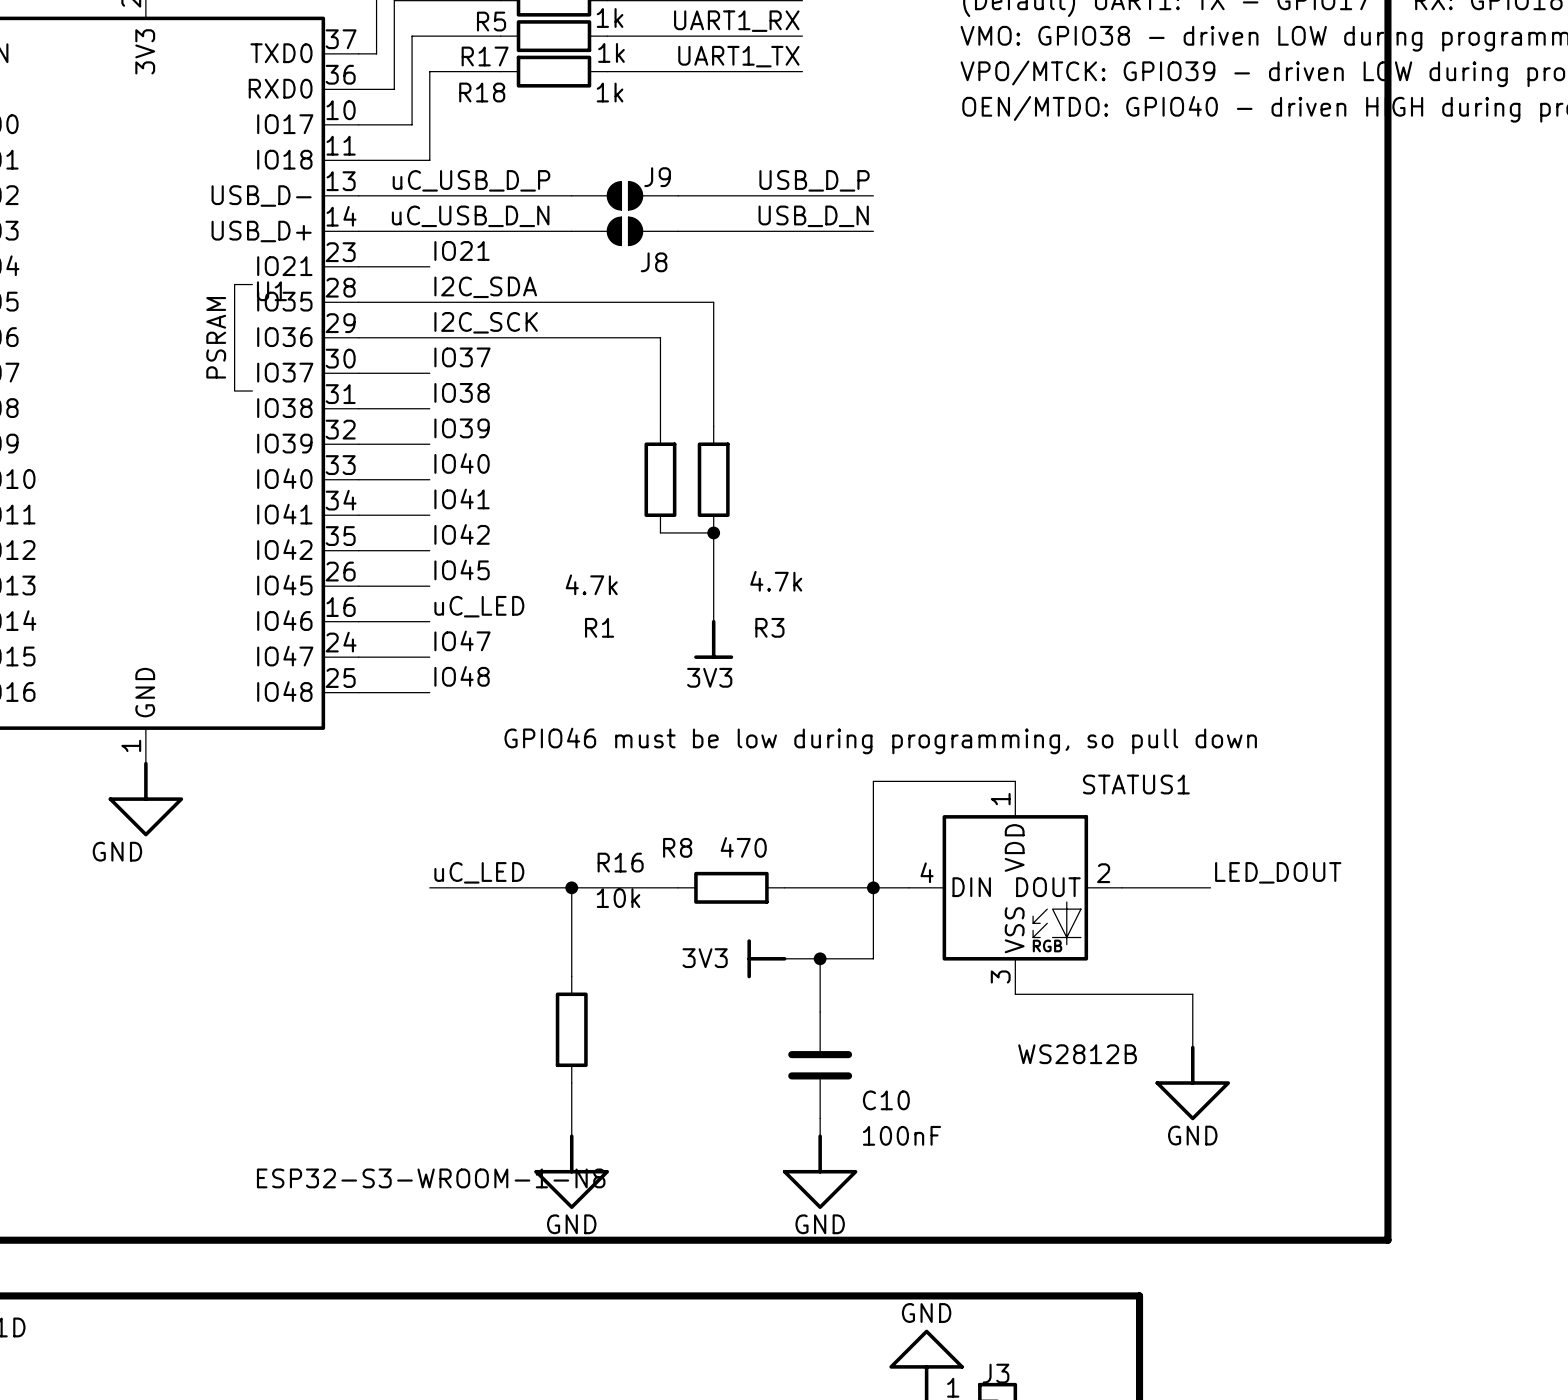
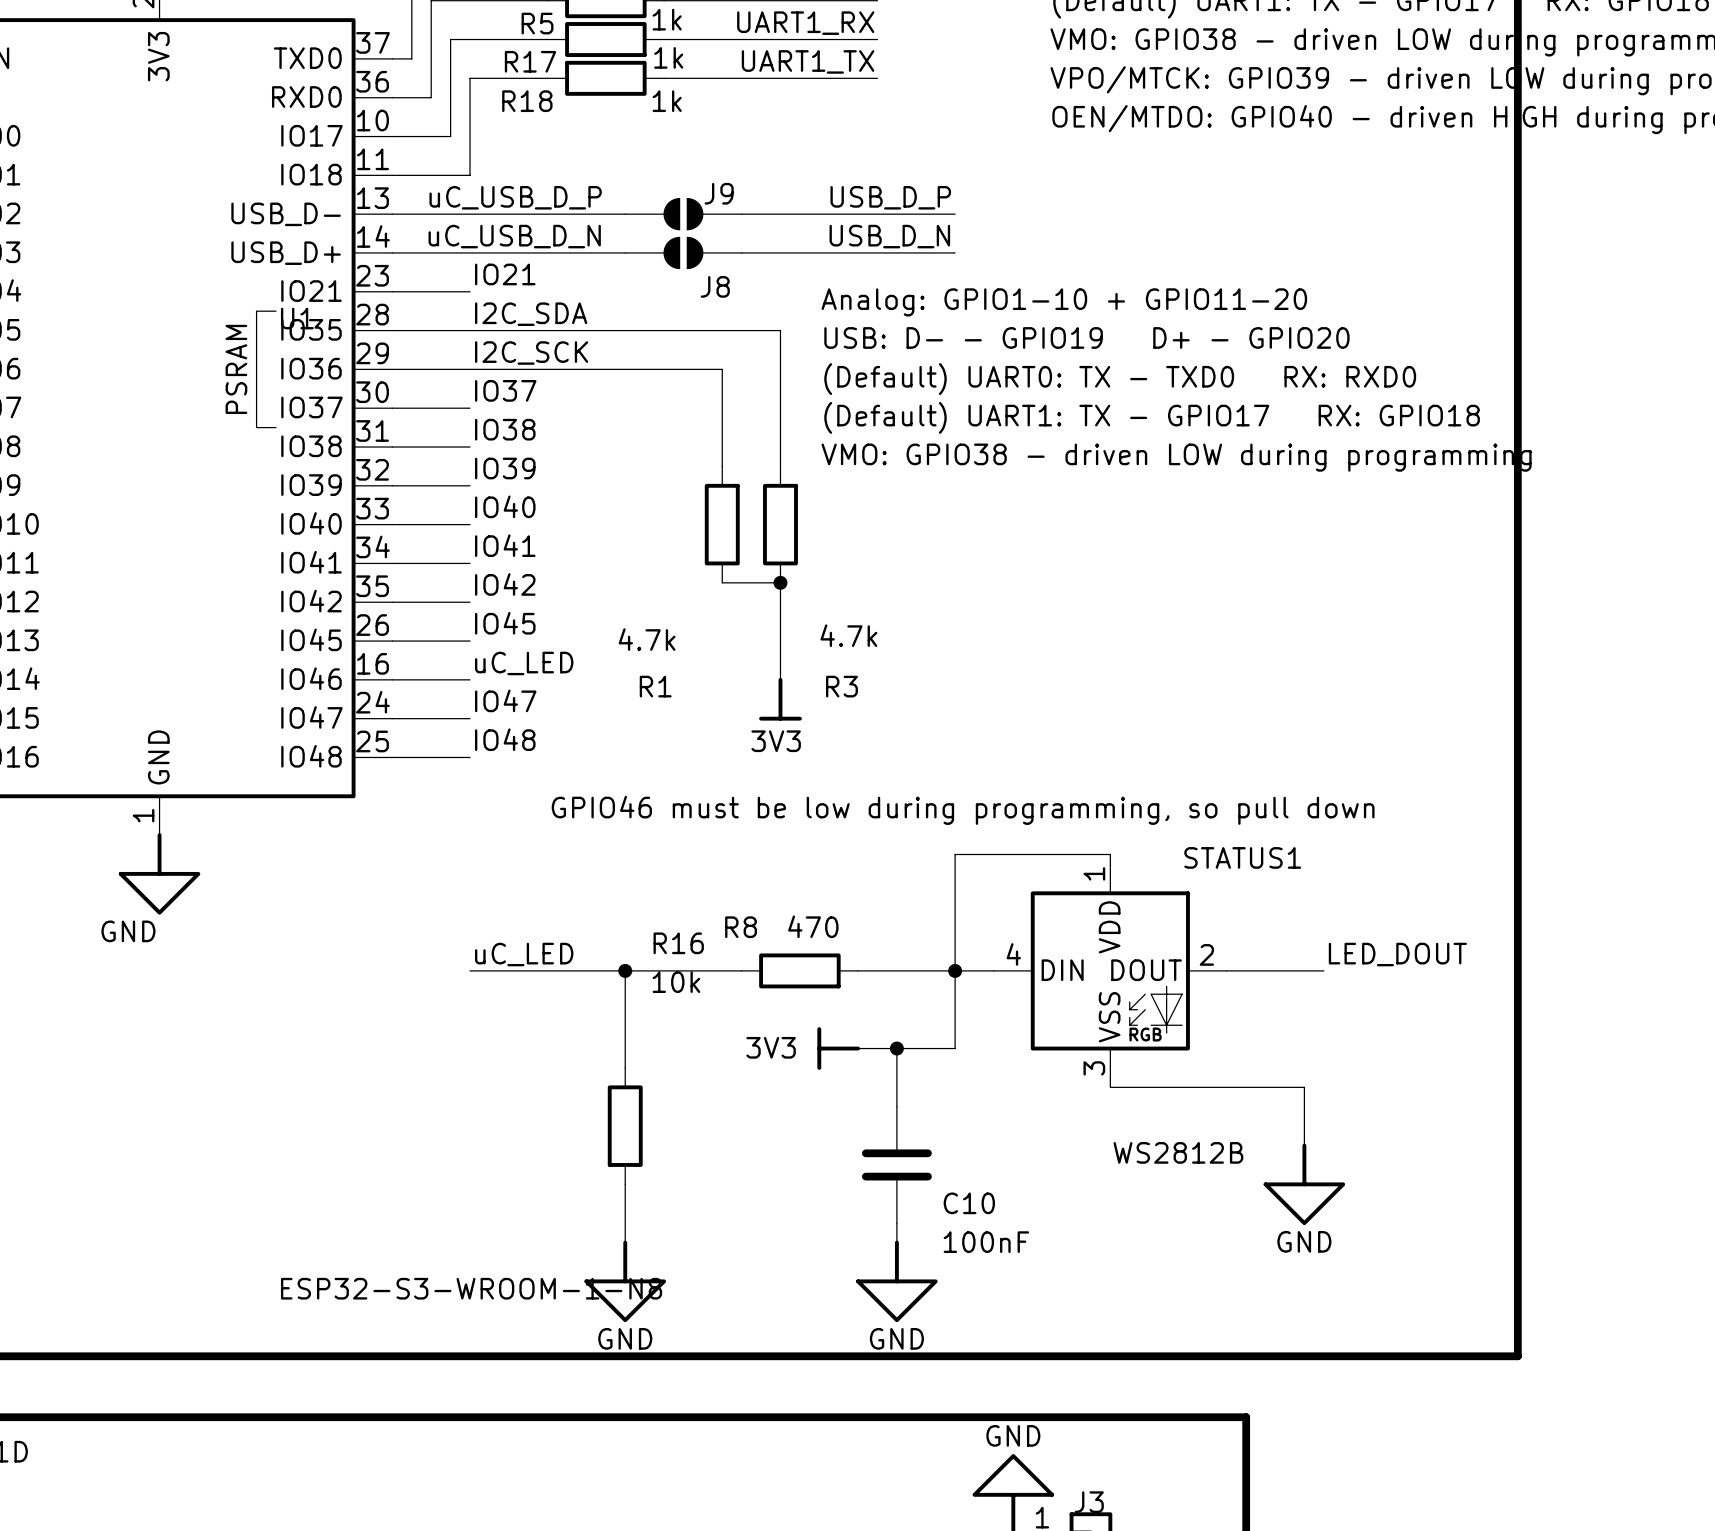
text: none -> Analog: GPIO1-10 + GPIO11-20 (1064, 302)
text: none -> USB: D- - GPIO19 D+ - GPIO20 (1086, 337)
text: none -> (Default) UART0: TX - TXD0 RX: RXD0 (1120, 379)
text: none -> (Default) UART1: TX - GPIO17 RX: GPIO18 (1152, 417)
text: none -> VMO: GPIO38 - driven LOW during programming (1176, 457)

